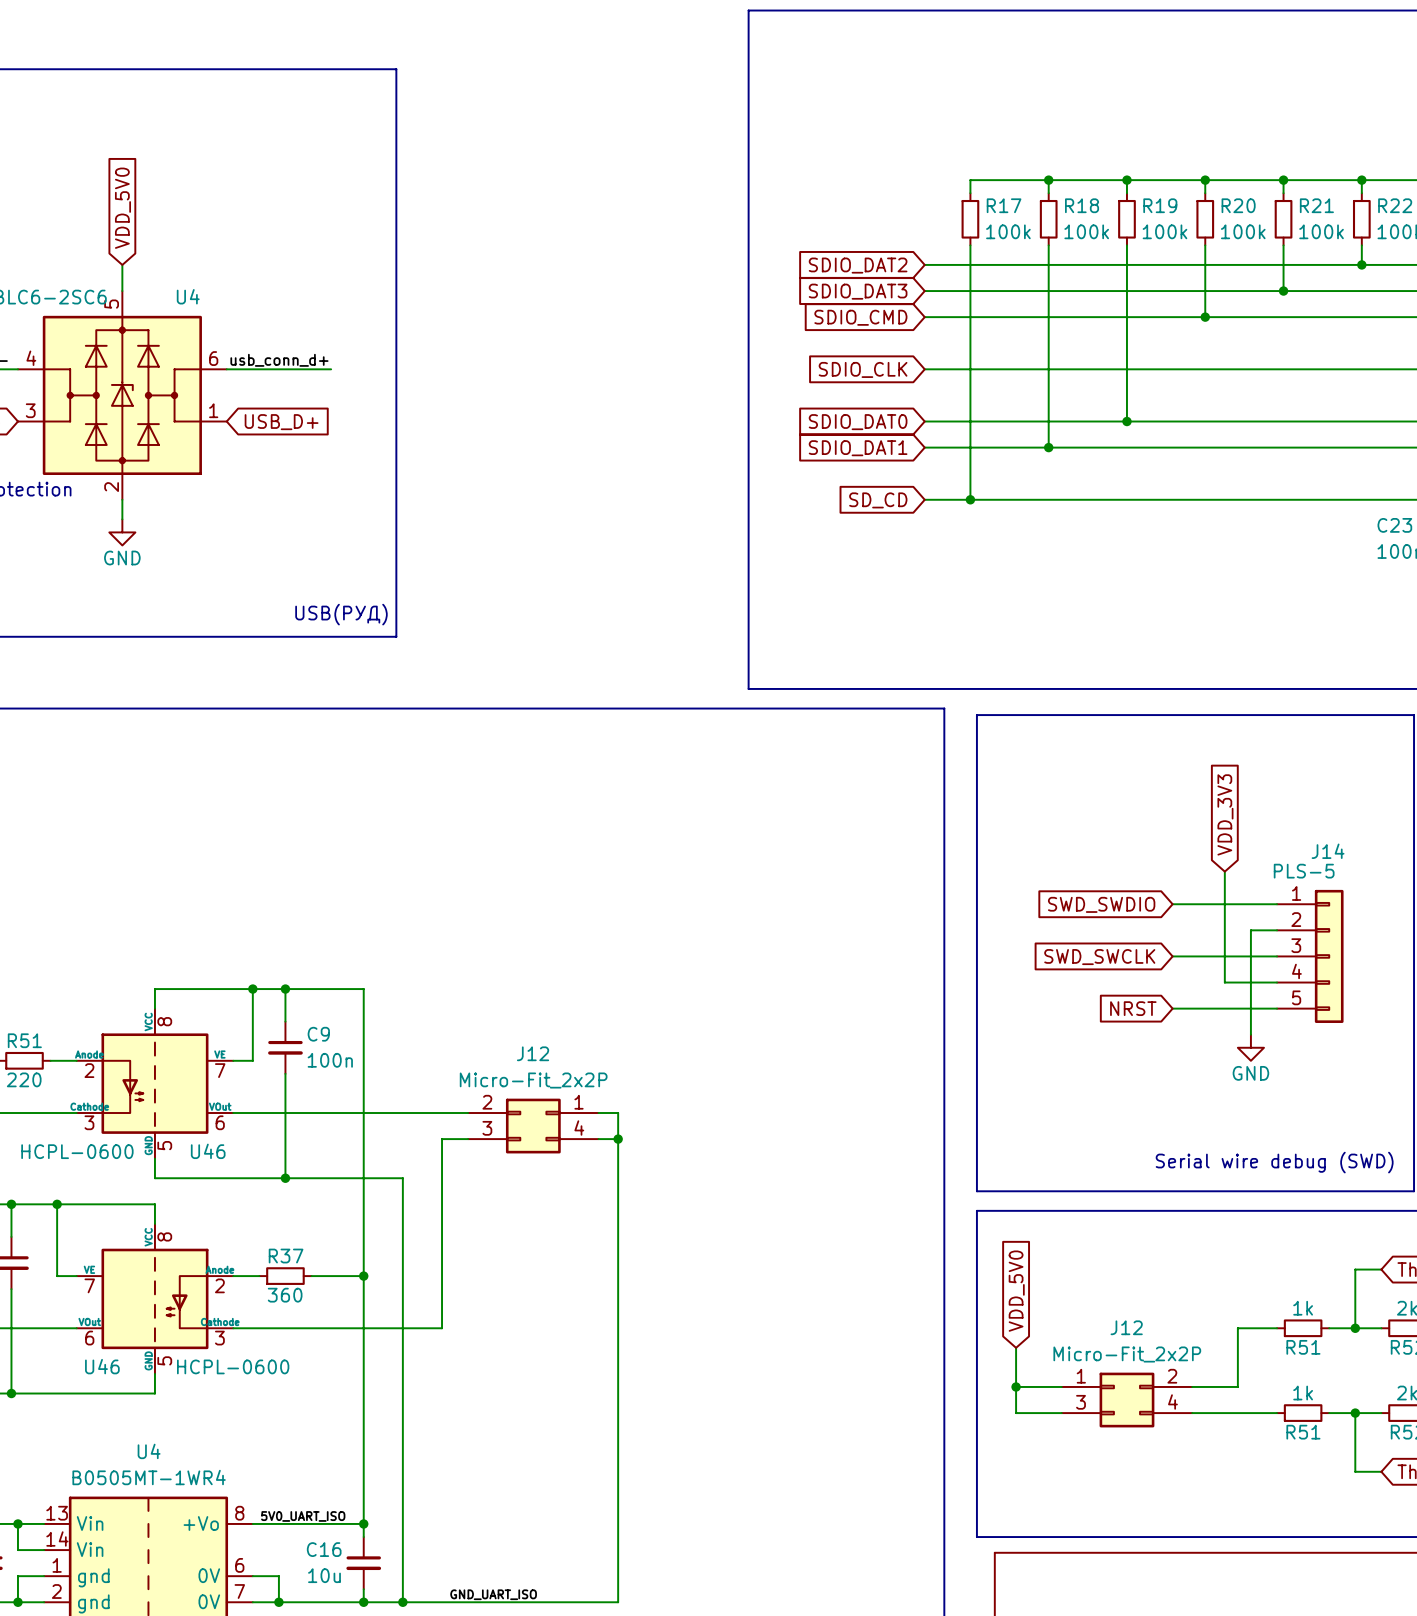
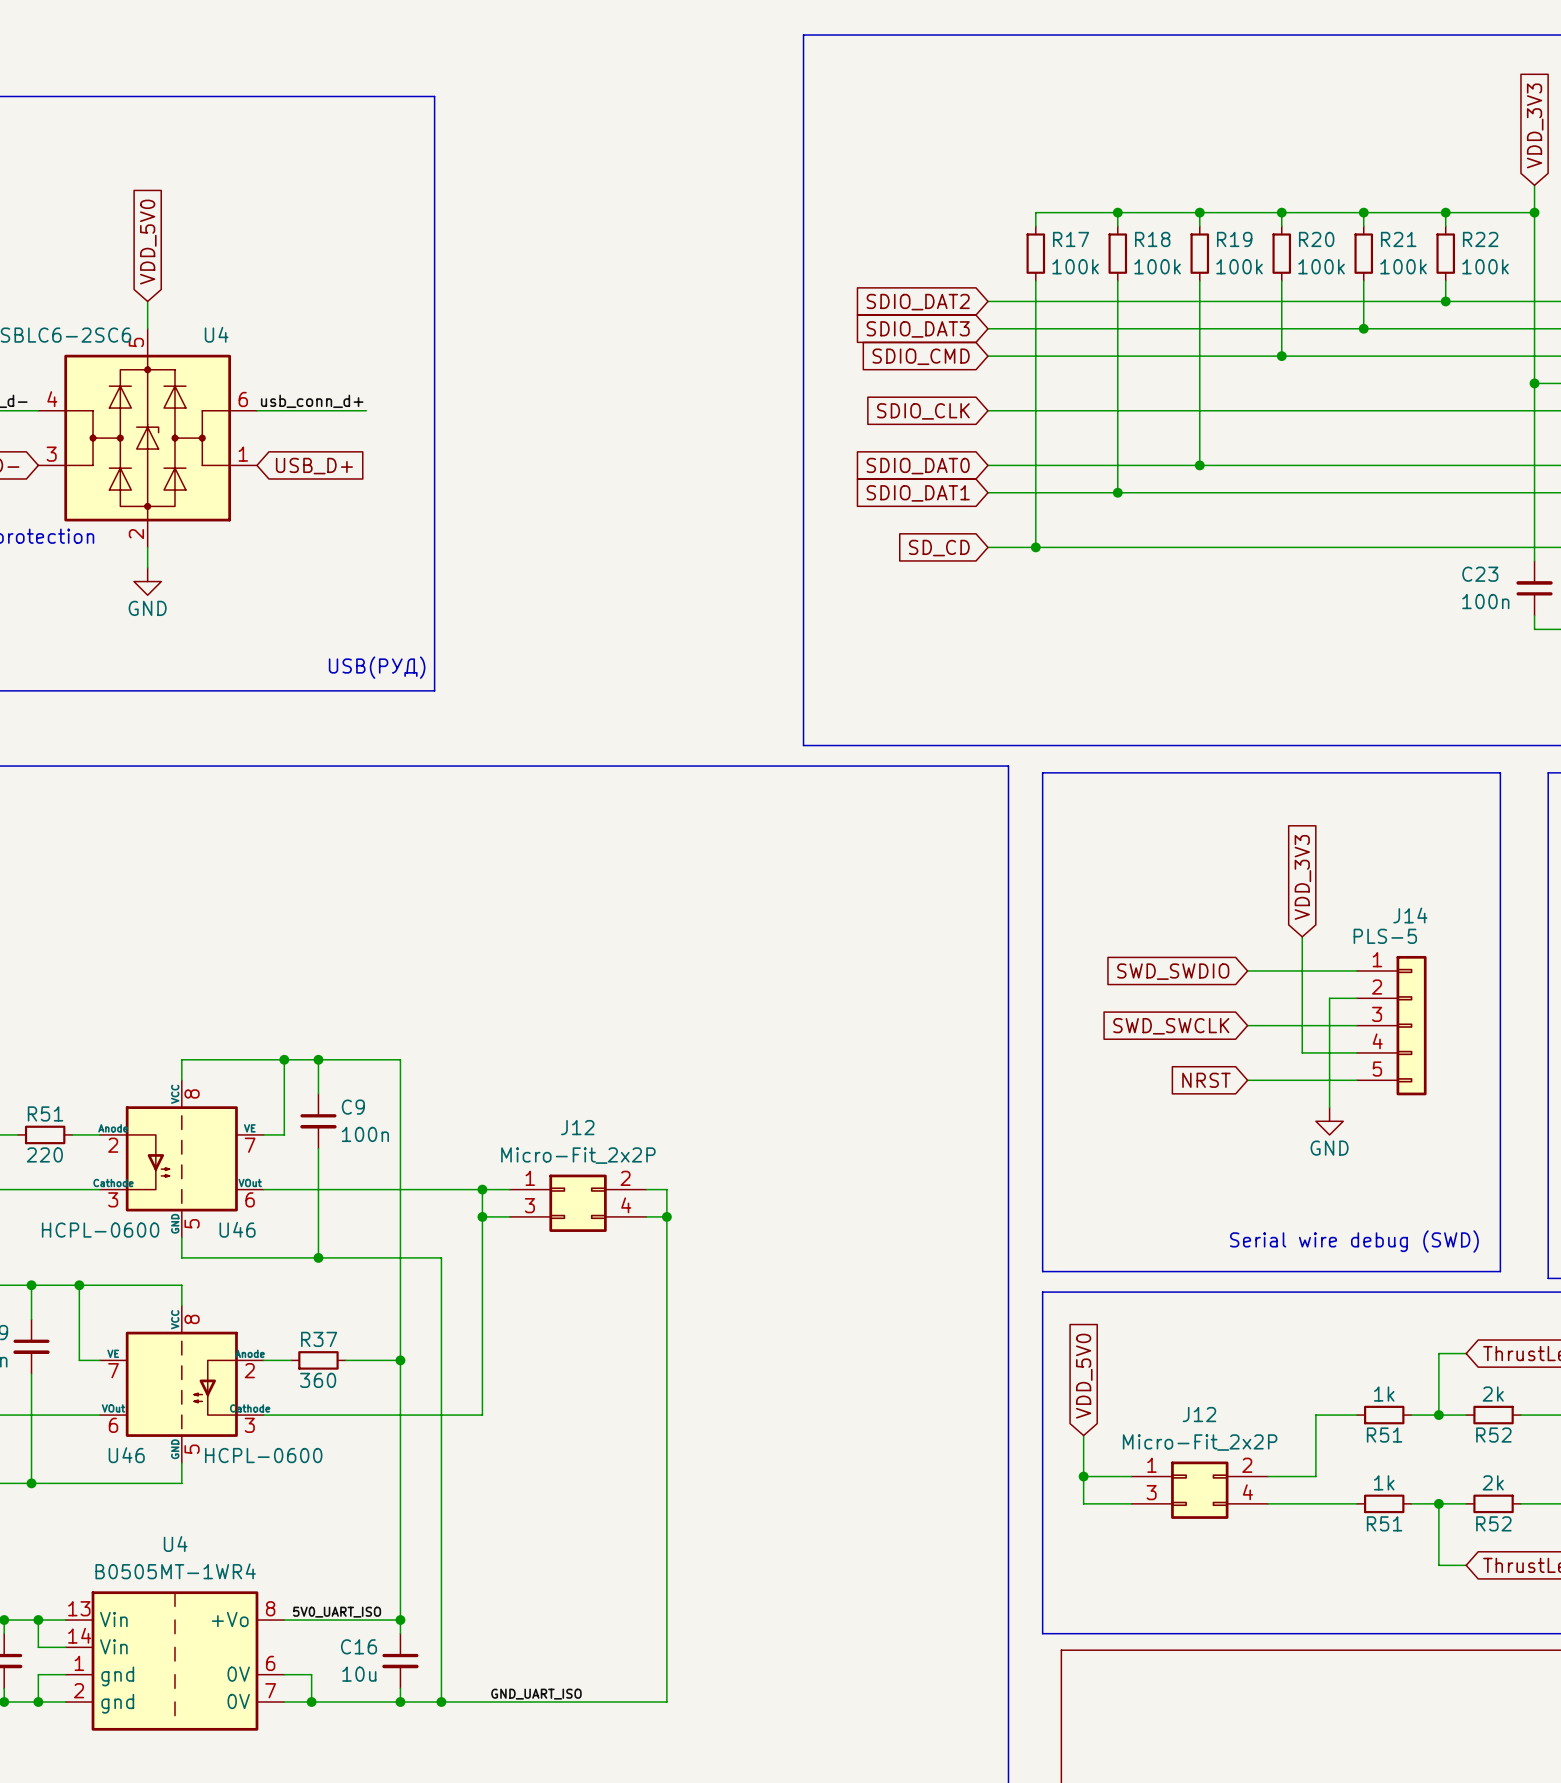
J12 pin number: 2 (487, 1102) -> 1 (530, 1178)
J12 pin number: 1 (579, 1102) -> 2 (625, 1178)
wire: none -> (482, 1189) (482, 1216)
junction: none -> (482, 1189)
junction: none -> (482, 1216)

